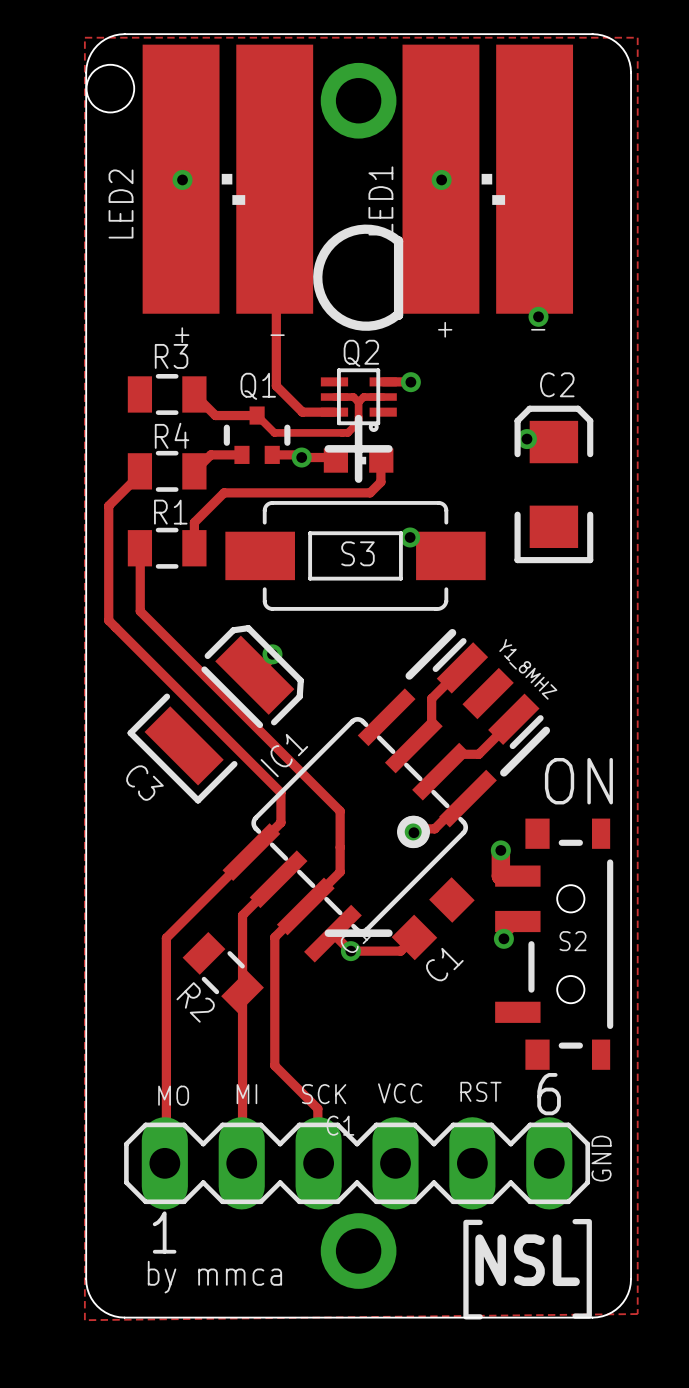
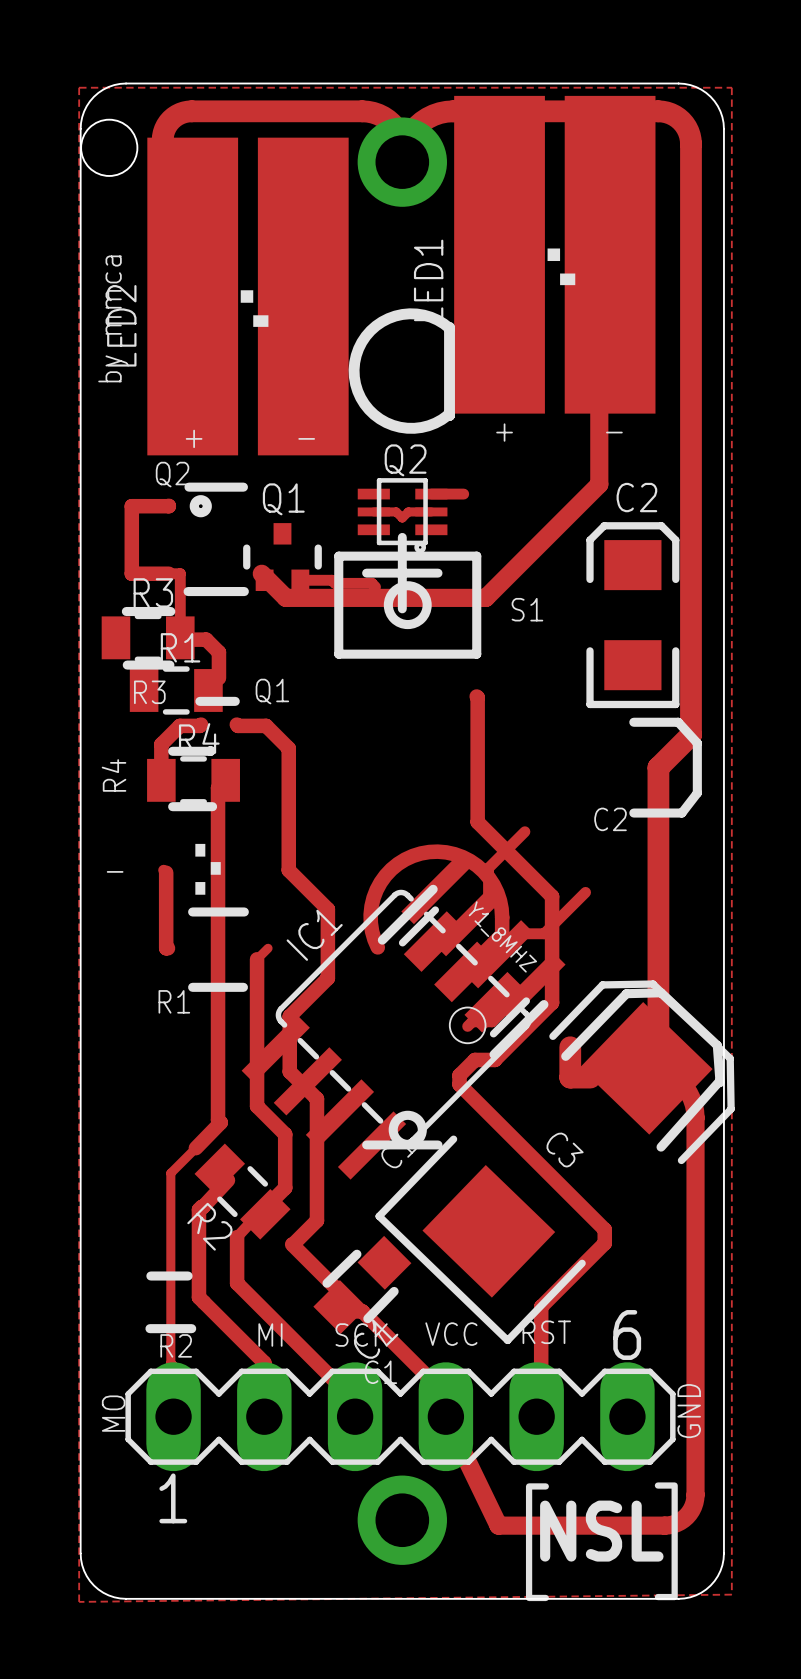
via: (182, 179) -> none
LED2 position: (227, 179) -> (247, 296)
track: (274, 179) (276, 386) (302, 412) (334, 412) -> none
via: (441, 179) -> none
track: none -> (192, 296) (191, 218) (188, 211) (180, 202) (174, 198) (162, 196) (163, 132) (168, 122) (180, 113) (191, 111) (373, 112) (387, 119) (398, 132) (403, 147) (404, 153) (402, 153) (402, 162) (402, 155) (404, 148) (412, 131) (427, 118) (446, 111) (662, 111) (674, 115) (686, 127) (690, 144) (690, 735) (658, 767) (658, 1056) (646, 1068)
track: none -> (611, 296) (599, 309) (599, 484) (485, 597) (285, 597) (261, 573)
text: none -> by mmca (113, 318)
via: (538, 316) -> none
text: none -> Q2 (172, 474)
line: none -> (188, 487) (243, 487)
drawing: none -> [189, 495, 212, 518]
via: (410, 382) -> none
track: none -> (168, 506) (131, 506) (131, 573) (180, 573) (180, 637) (182, 639) (206, 639) (218, 652) (218, 678)
R3 position: (167, 394) -> (148, 637)
track: (194, 394) (215, 415) (257, 415) (274, 432) (347, 432) (358, 422) (358, 402) -> none
line: none -> (338, 556) (476, 556) (476, 654) (338, 654) (338, 556)
via: (526, 439) -> none
track: (241, 454) (210, 454) (194, 471) -> none
drawing: none -> [383, 581, 432, 630]
via: (301, 457) -> none
part: (358, 460) -> none
track: (380, 460) (380, 482) (370, 492) (224, 492) (194, 522) (194, 548) -> none
line: none -> (188, 591) (244, 591)
track: (139, 471) (139, 474) (108, 505) (108, 620) (280, 792) (280, 822) (166, 938) (166, 1161) (164, 1163) -> (225, 780) (218, 788) (218, 1119) (220, 1122) (170, 1173) (170, 1363) (173, 1365) (173, 1416)
R4 position: (167, 471) -> (193, 780)
text: none -> S1 (527, 609)
line: none -> (126, 611) (170, 611)
line: none -> (127, 665) (169, 665)
via: (410, 537) -> none
track: (140, 548) (140, 611) (340, 811) (340, 872) (274, 937) (274, 1065) (317, 1108) (318, 1163) -> (268, 948) (257, 959) (257, 1106) (285, 1134) (285, 1187) (237, 1237) (237, 1283) (355, 1401) (355, 1416)
text: none -> R3 (149, 692)
text: none -> Q1 (272, 691)
track: none -> (476, 696) (477, 822) (552, 896) (552, 1002) (494, 1059) (474, 1059) (459, 1075) (459, 1084) (604, 1229) (604, 1243) (541, 1306) (541, 1412) (536, 1416)
S3: (355, 555) -> none
line: none -> (199, 701) (235, 701)
line: none -> (633, 722) (678, 722) (697, 743) (697, 793) (681, 813) (633, 813)
track: none -> (201, 724) (179, 725) (161, 744) (161, 780)
track: none -> (236, 724) (266, 725) (288, 748) (288, 870) (327, 909) (327, 978) (289, 1016) (289, 1071) (316, 1098) (316, 1220) (292, 1244) (340, 1292) (340, 1307) (344, 1311) (362, 1311) (445, 1394) (445, 1416) (498, 1525) (668, 1525) (676, 1523) (686, 1516) (694, 1502) (695, 1111) (688, 1092) (681, 1082) (665, 1072) (646, 1068)
line: none -> (210, 750) (172, 751)
text: none -> R4 (114, 775)
C3 footprint: [127, 625, 304, 804] -> [375, 980, 735, 1345]
line: (452, 632) (409, 675) -> (433, 889) (382, 940)
line: none -> (172, 806) (212, 806)
via: (272, 654) -> none
text: none -> C2 (610, 819)
Y1_8MHZ name position: Y1_8MHZ (528, 669) -> Y1_8MHZ (502, 936)
drawing: none -> [195, 843, 221, 895]
Y1_8MHZ position: (488, 693) -> (464, 971)
track: none -> (163, 870) (166, 872) (166, 948) (168, 948)
text: none -> - (115, 871)
line: (546, 730) (503, 772) -> (543, 1004) (494, 1054)
line: none -> (192, 911) (244, 911)
track: none -> (377, 947) (370, 923) (371, 906) (376, 889) (385, 875) (397, 864) (412, 855) (429, 852) (454, 854) (470, 860) (488, 877) (497, 892) (501, 908) (502, 934) (464, 971)
text: ON (578, 781) -> none
C3 name position: C3 (144, 783) -> C3 (565, 1150)
line: none -> (192, 987) (243, 987)
text: none -> R1 (174, 1001)
drawing position: (413, 831) -> (407, 1129)
via: (413, 832) -> none
via: (500, 850) -> none
line: none -> (565, 1056) (626, 993) (661, 992) (717, 1045) (720, 1082)
track: (278, 879) (242, 915) (241, 1163) -> (227, 1180) (198, 1209) (198, 1297) (264, 1362) (264, 1416)
line: none -> (719, 1081) (661, 1147)
C1 position: (433, 918) -> (362, 1284)
track: (332, 933) (350, 951) (400, 951) (414, 937) -> none
via: (503, 938) -> none
S2: (554, 944) -> none
via: (350, 951) -> none
line: none -> (356, 1254) (326, 1283)
line: none -> (150, 1276) (188, 1276)
line: none -> (394, 1291) (367, 1318)
line: none -> (149, 1328) (191, 1328)
text rotation: 0° (173, 1095) -> 90° counterclockwise (113, 1413)
text position: MO (173, 1095) -> MO (113, 1413)
text: none -> R2 (176, 1345)
text: by mmca (214, 1277) -> none

